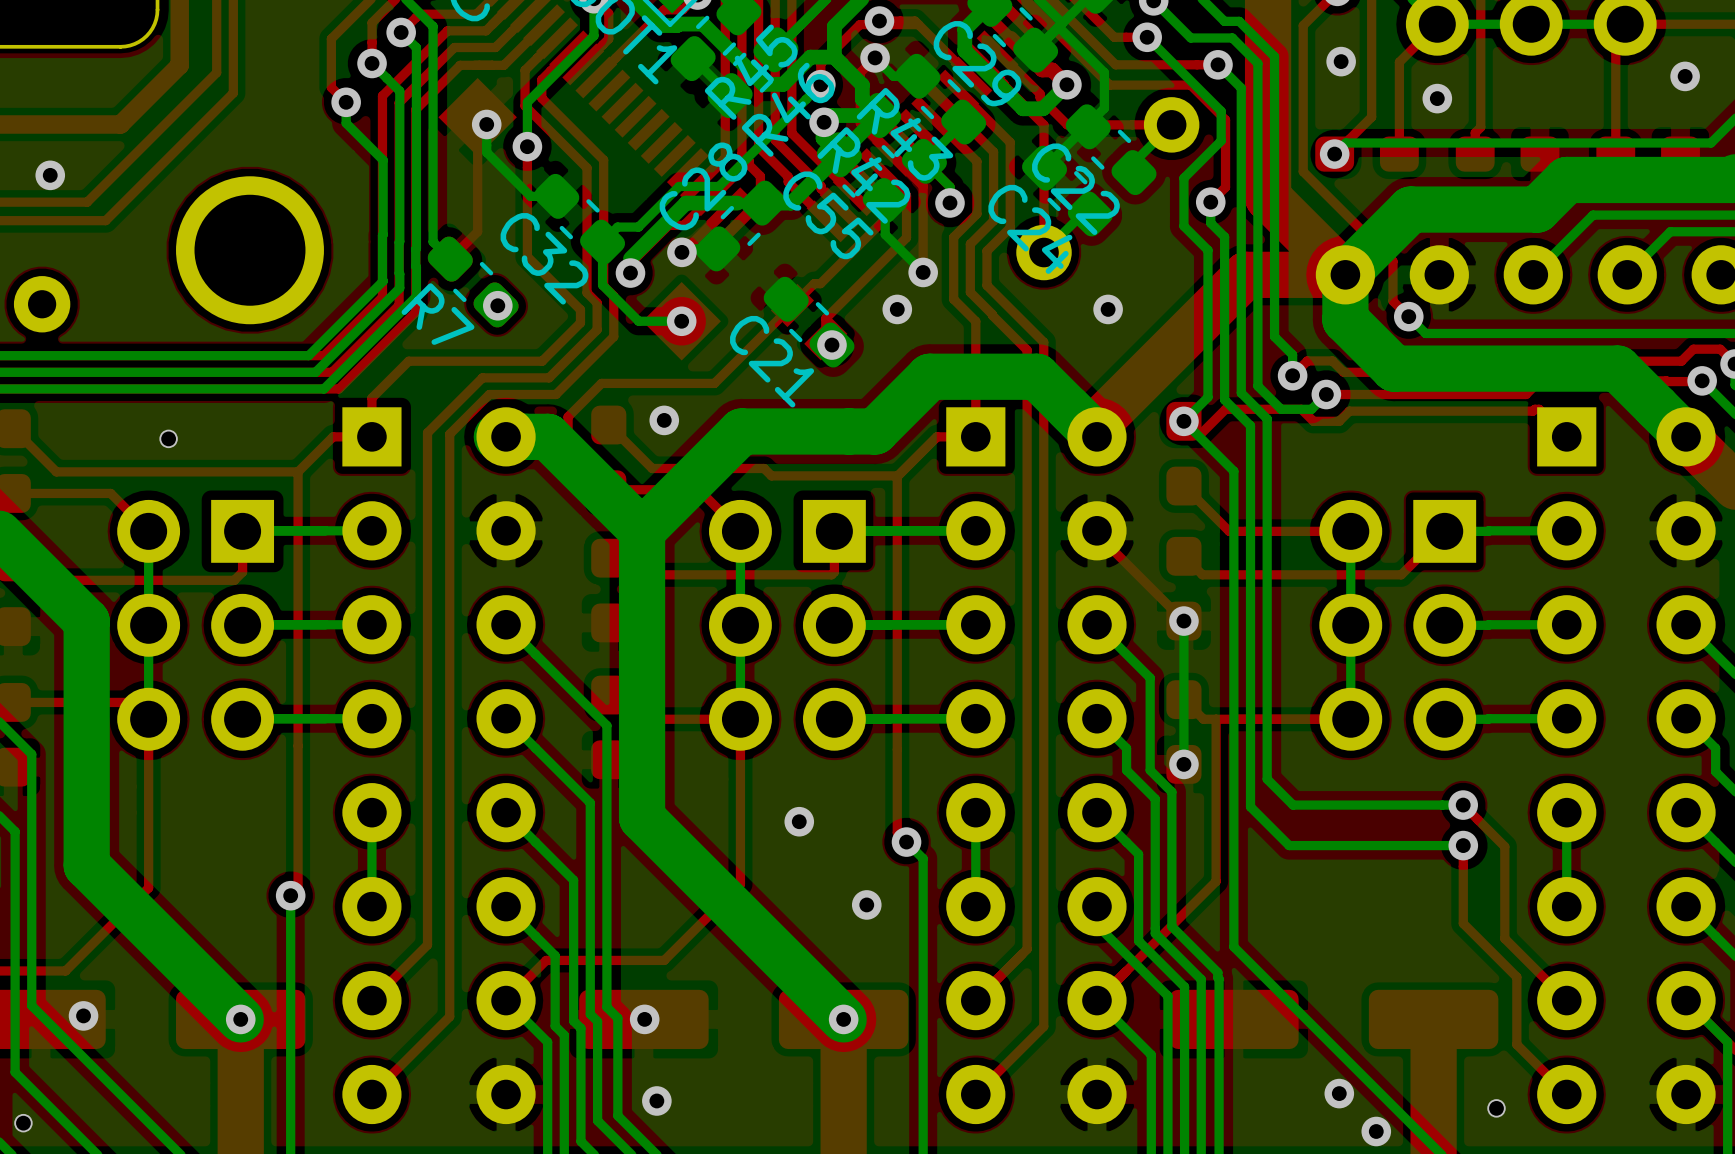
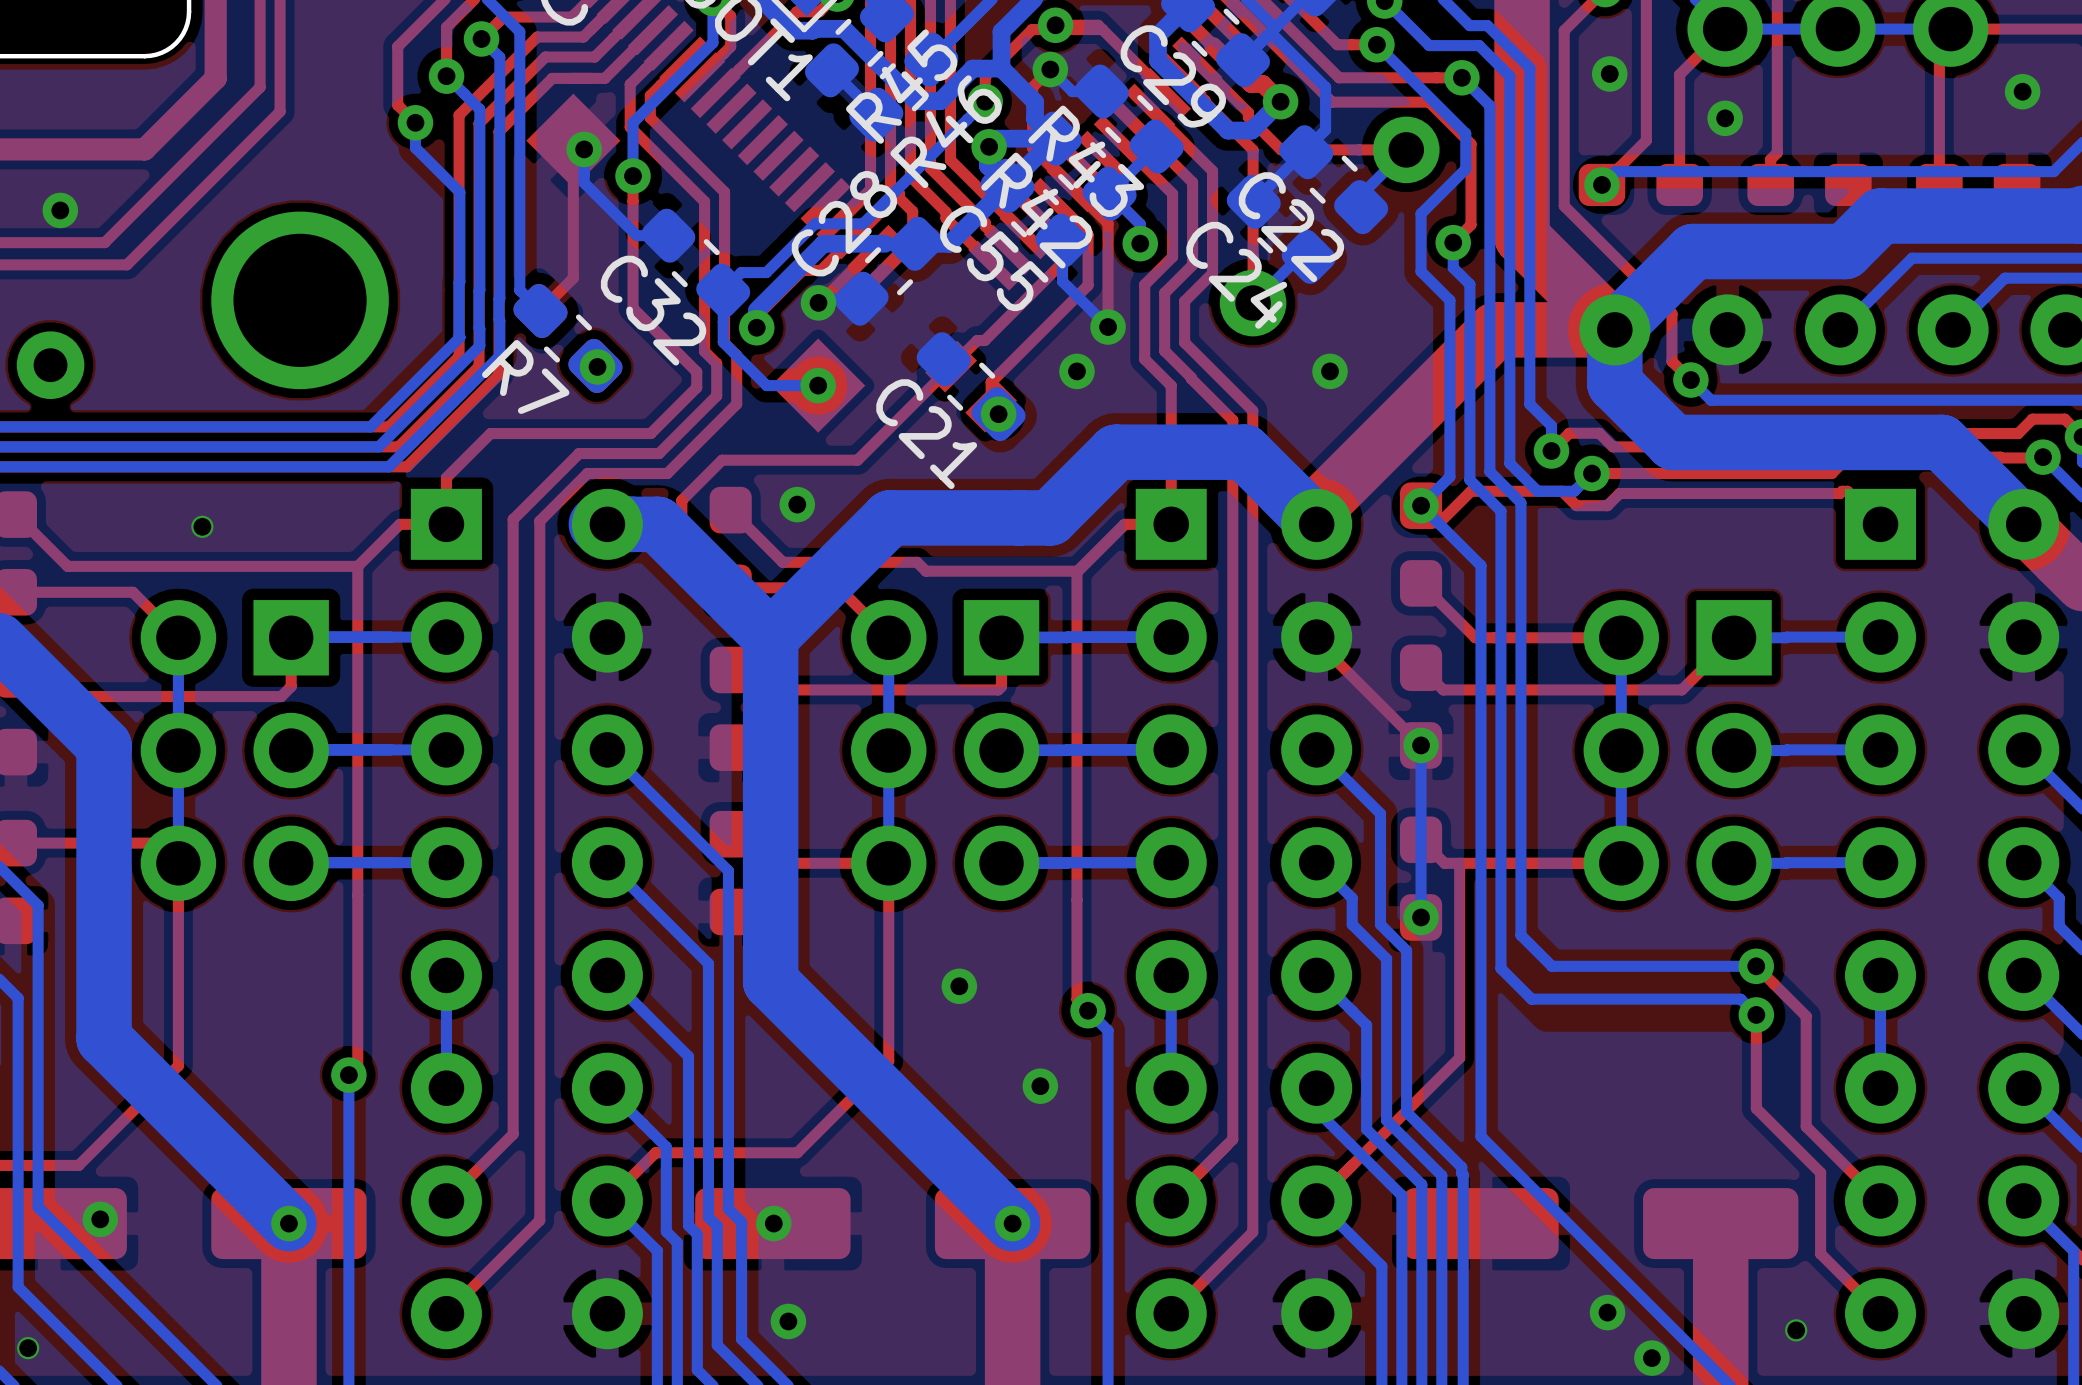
bottom track: (1276, 832) (1289, 845) (1463, 845) -> (1531, 999) (1740, 999) (1756, 1014)

